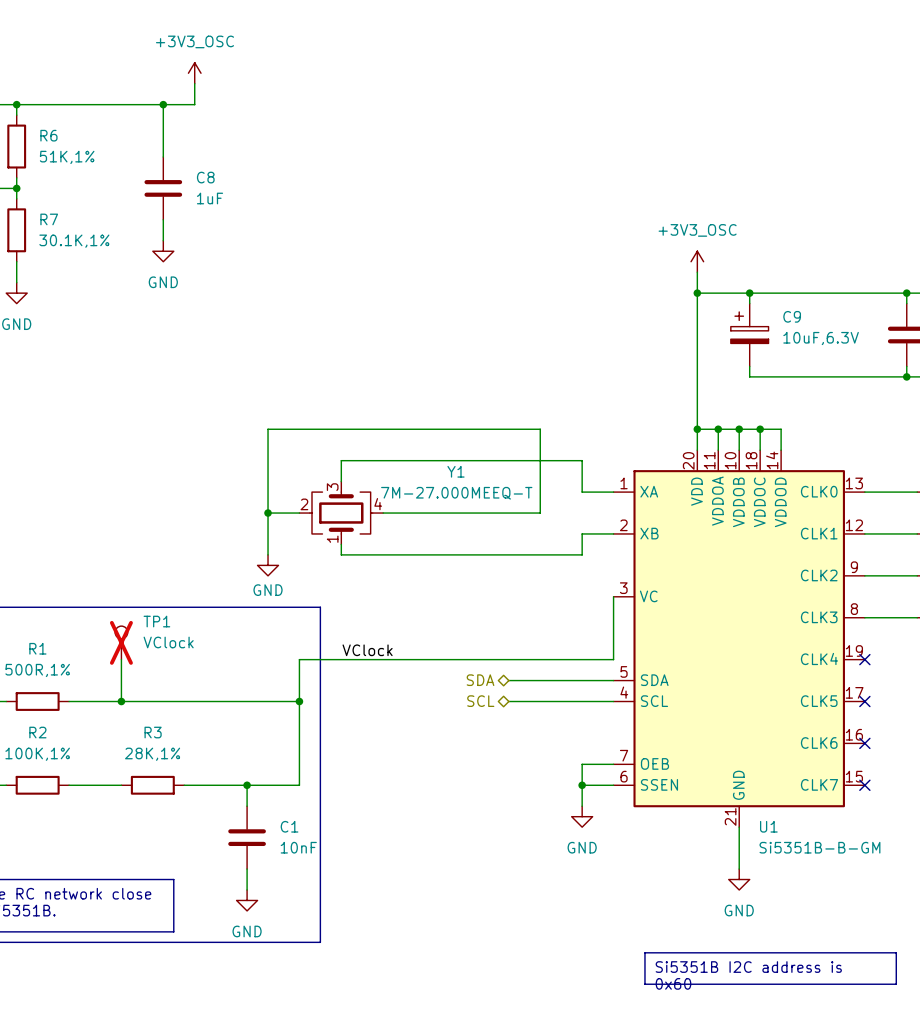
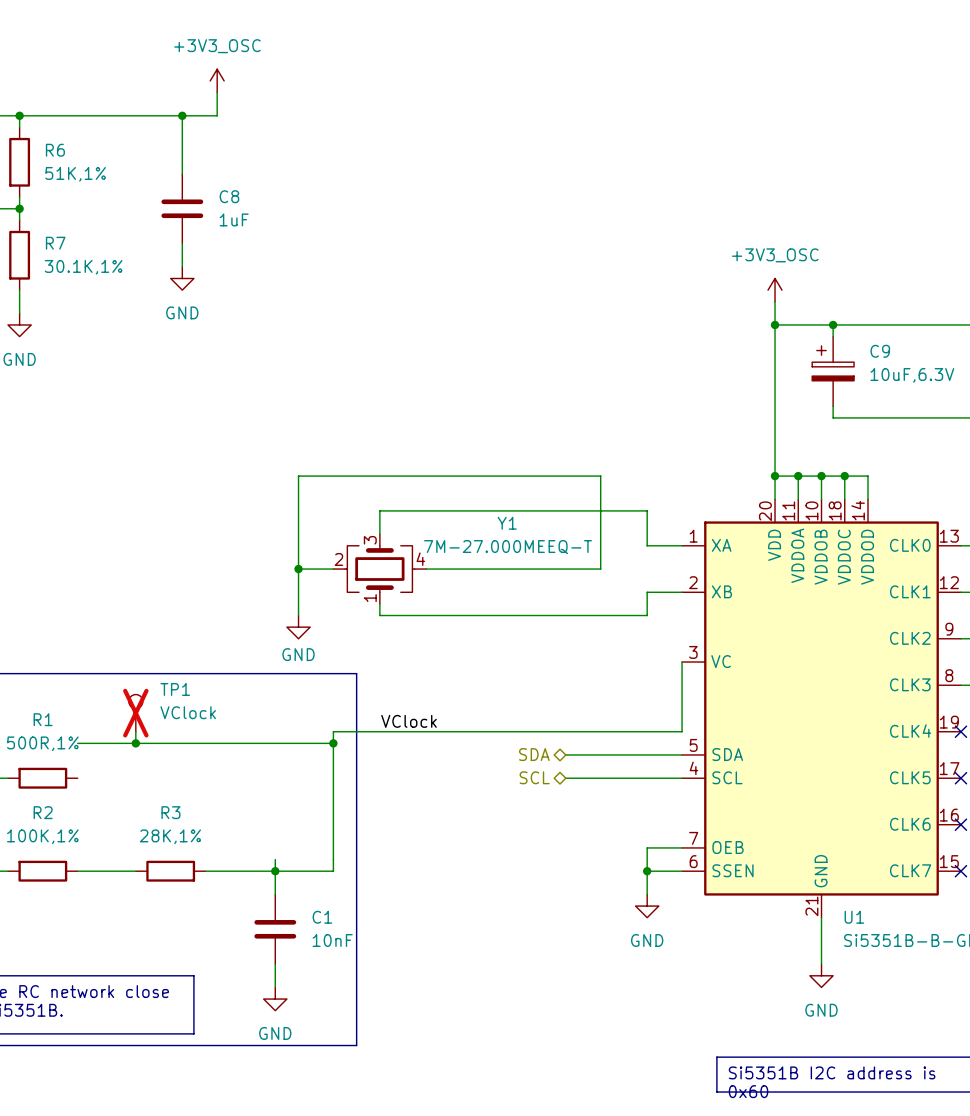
wire: (121, 670) (121, 701) -> none
wire: (69, 701) (299, 701) -> (77, 743) (333, 743)
junction position: (121, 701) -> (135, 743)
junction position: (299, 701) -> (333, 743)
wire: none -> (275, 859) (275, 871)

